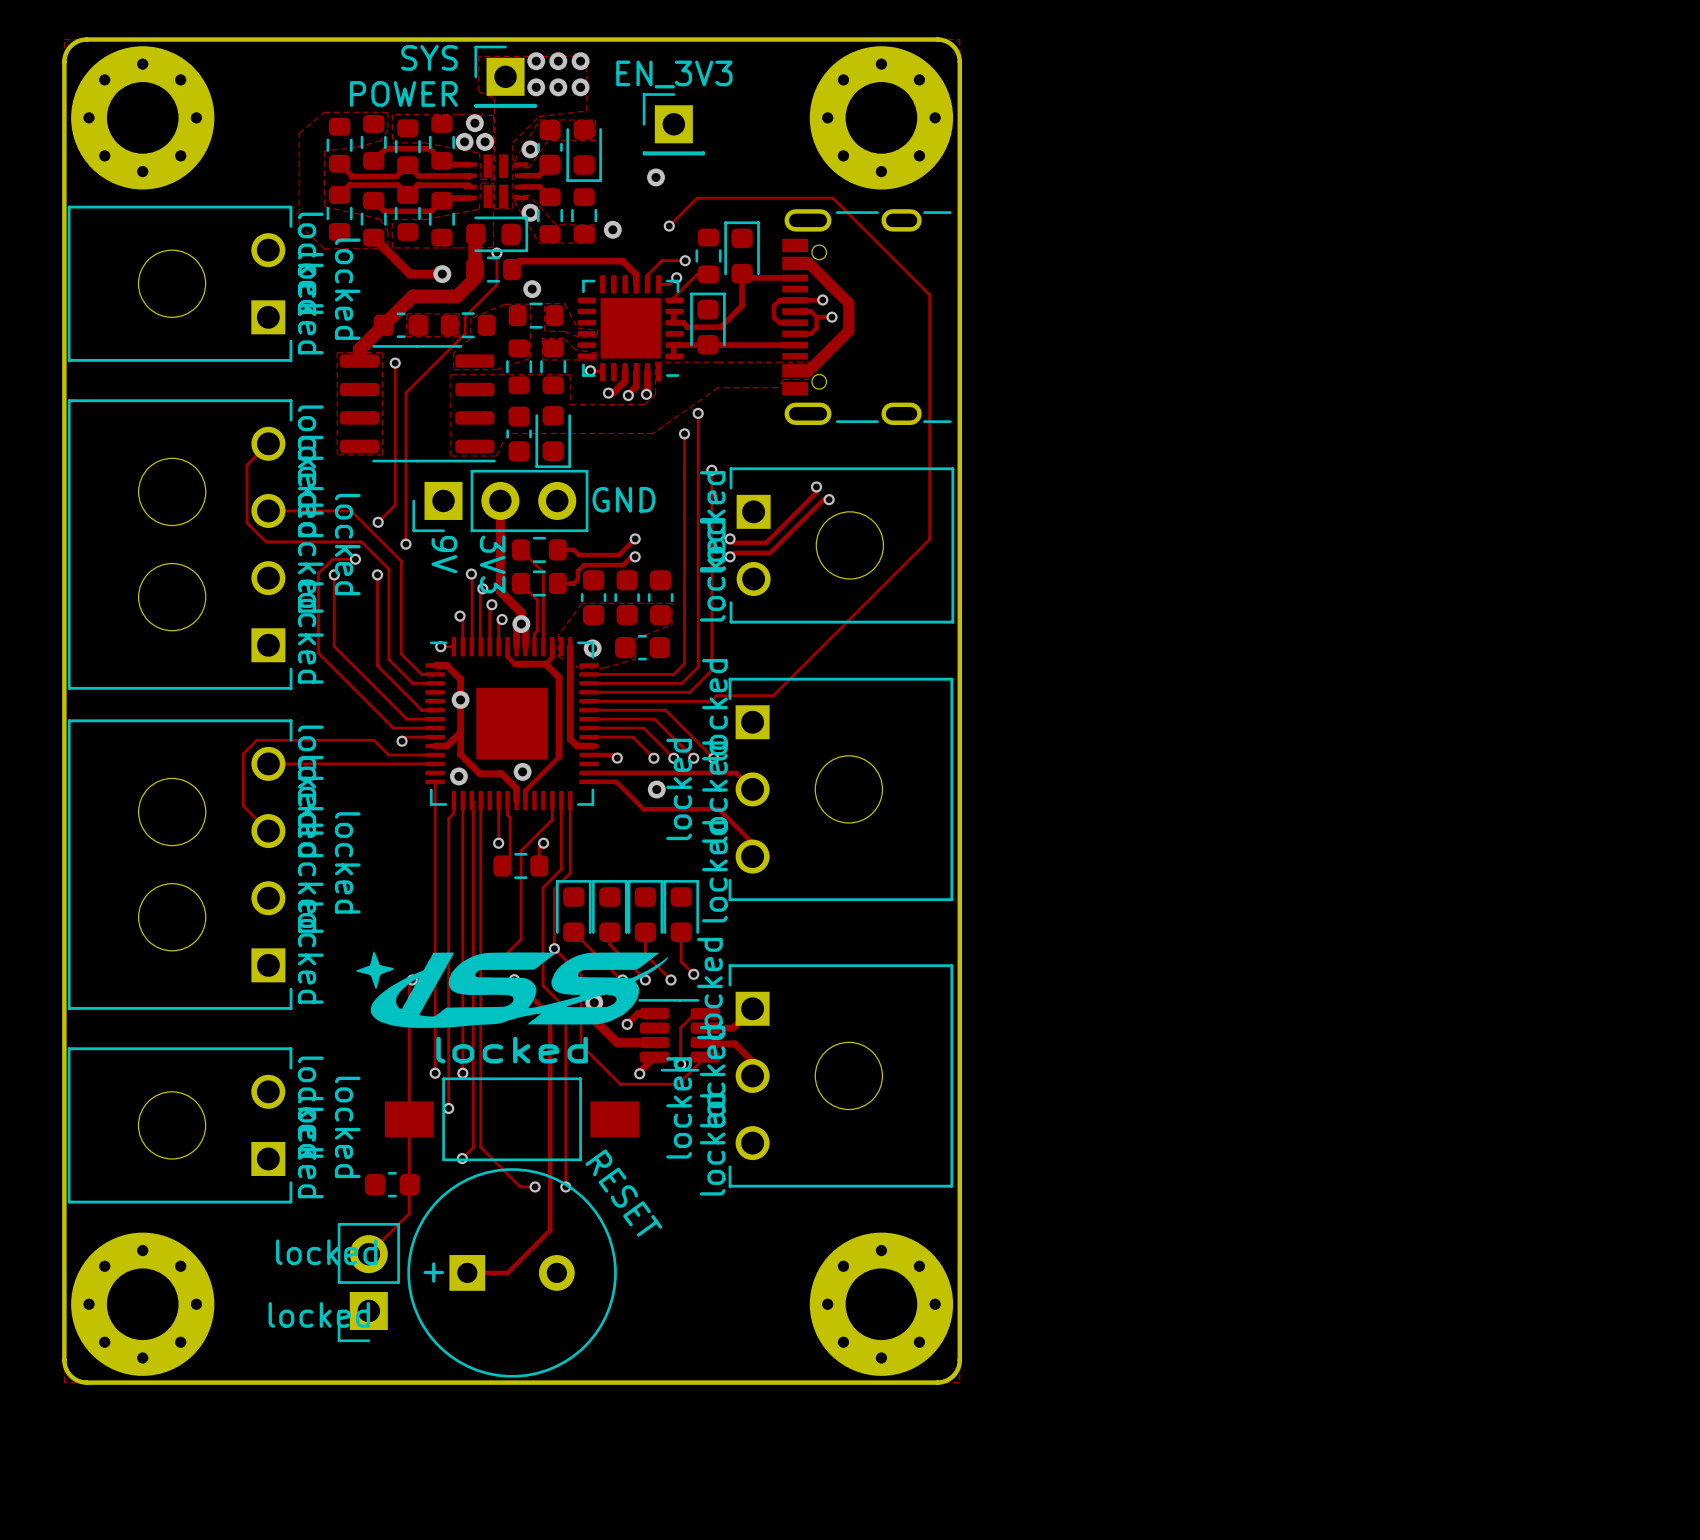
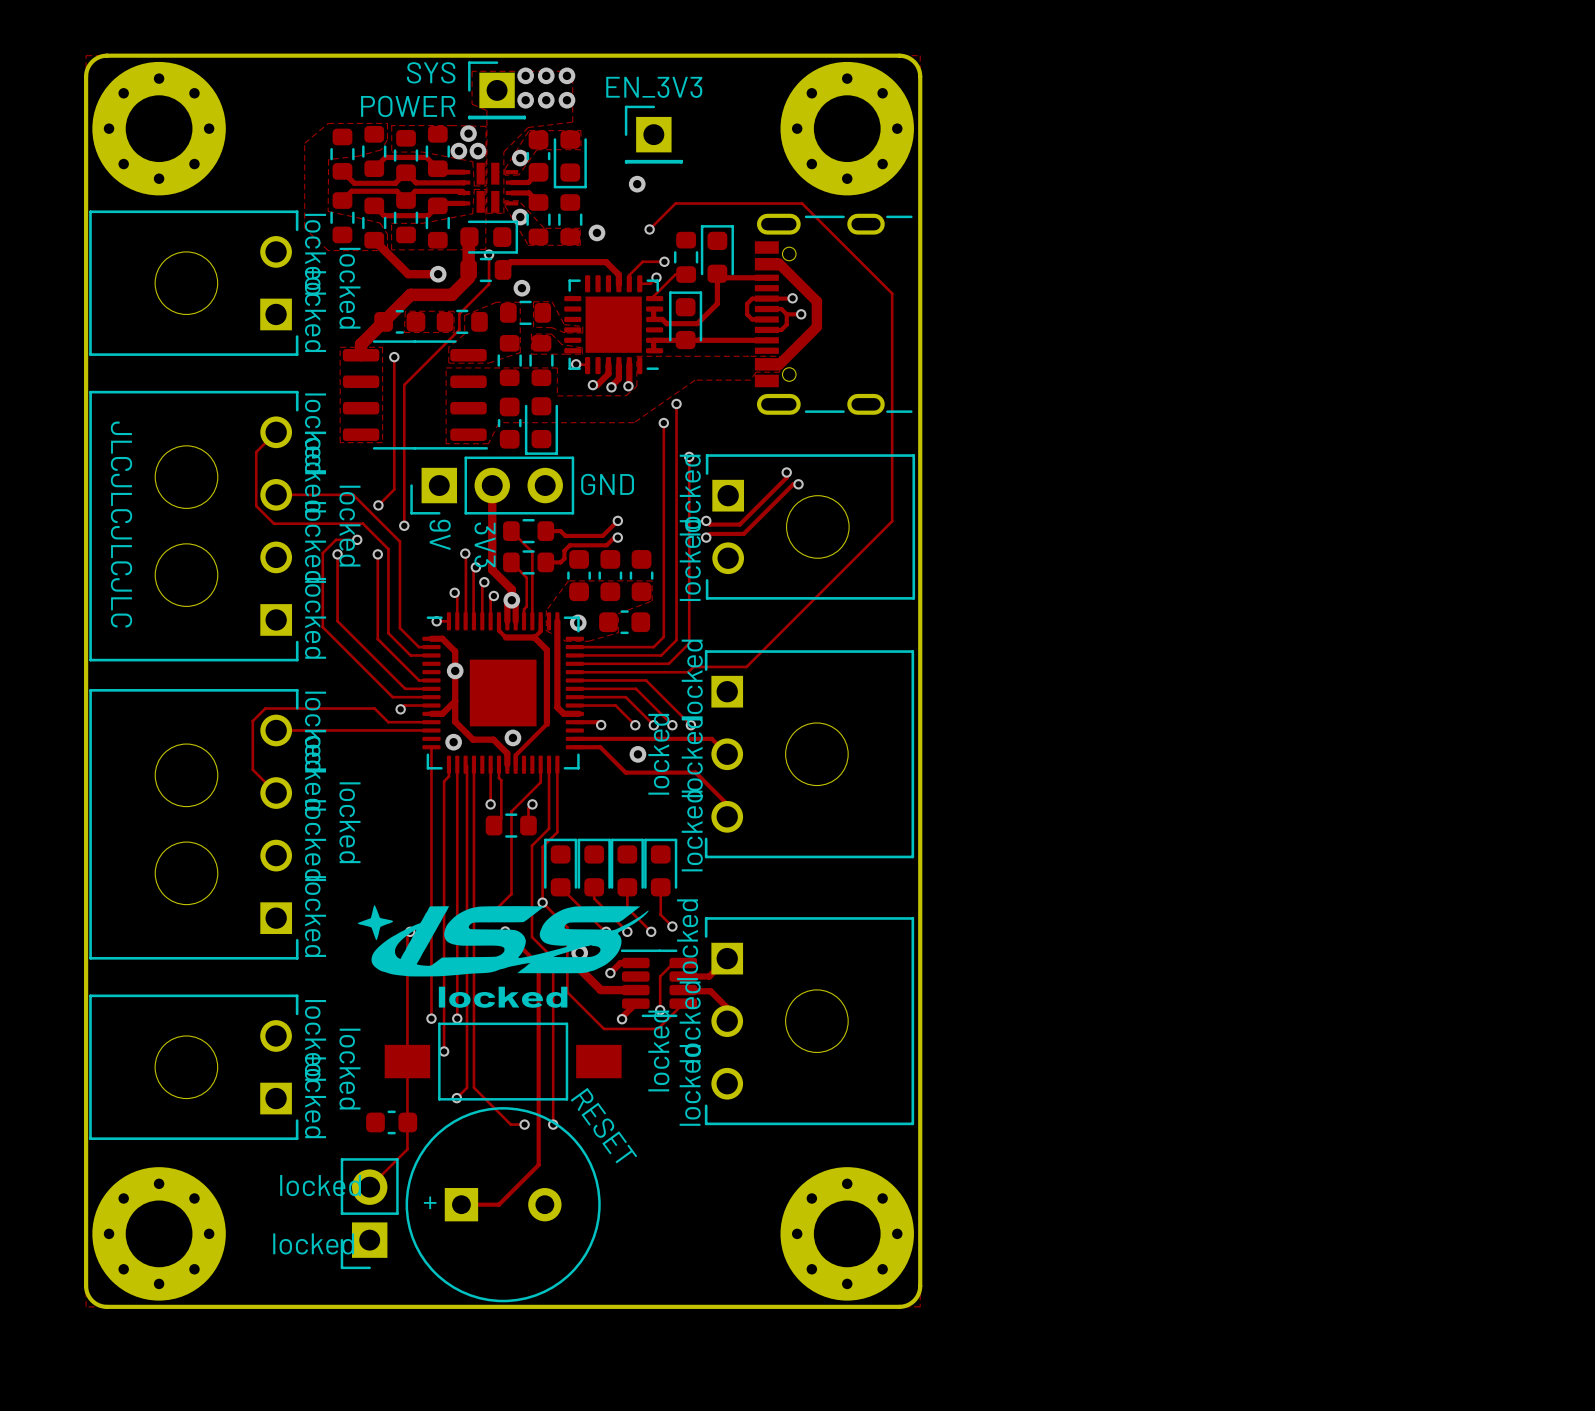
text: none -> JLCJLCJLCJLC (121, 524)

